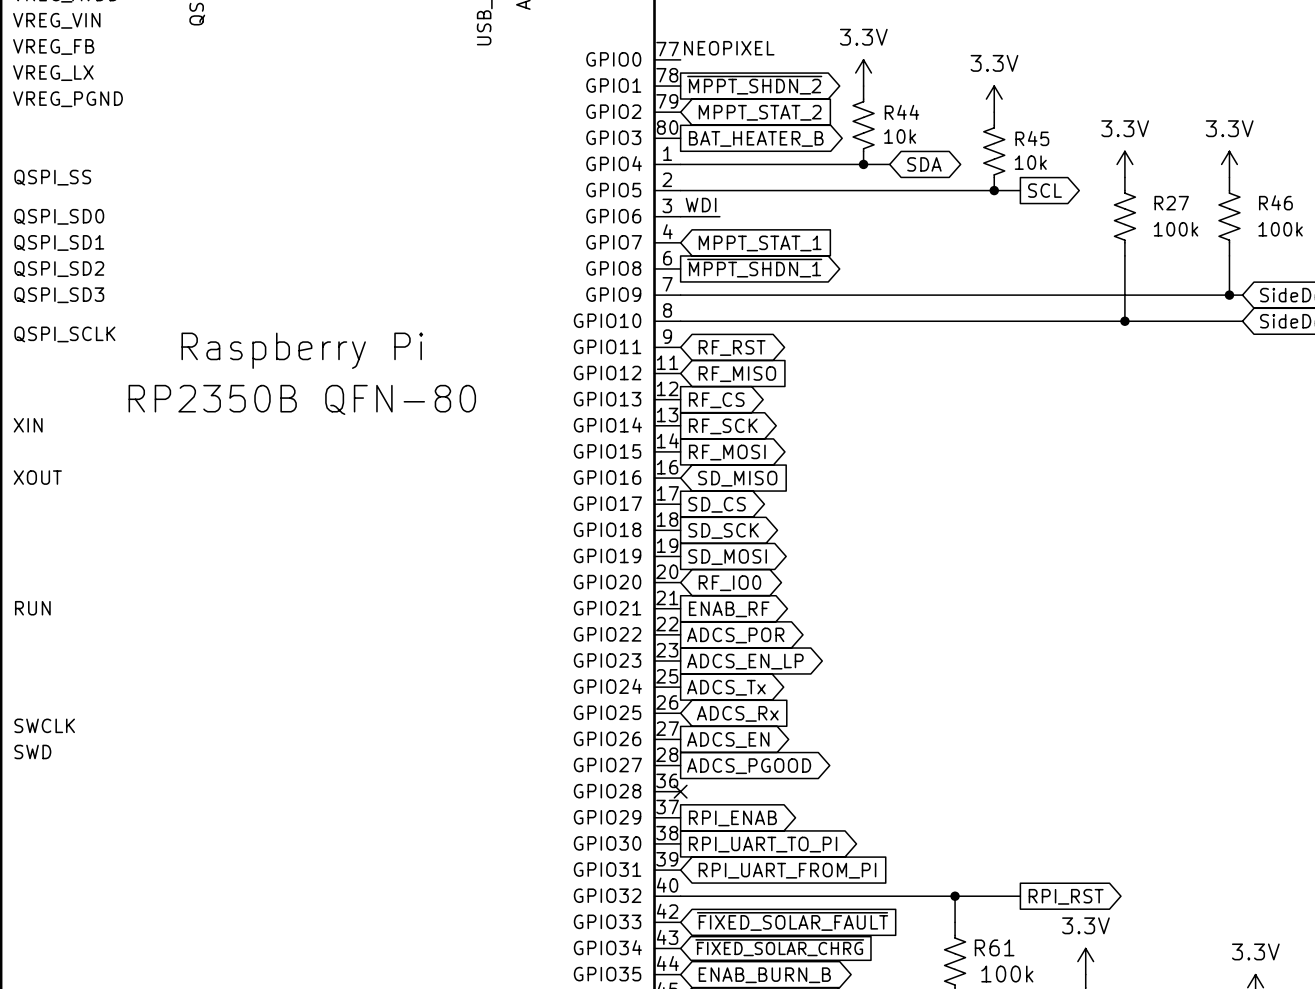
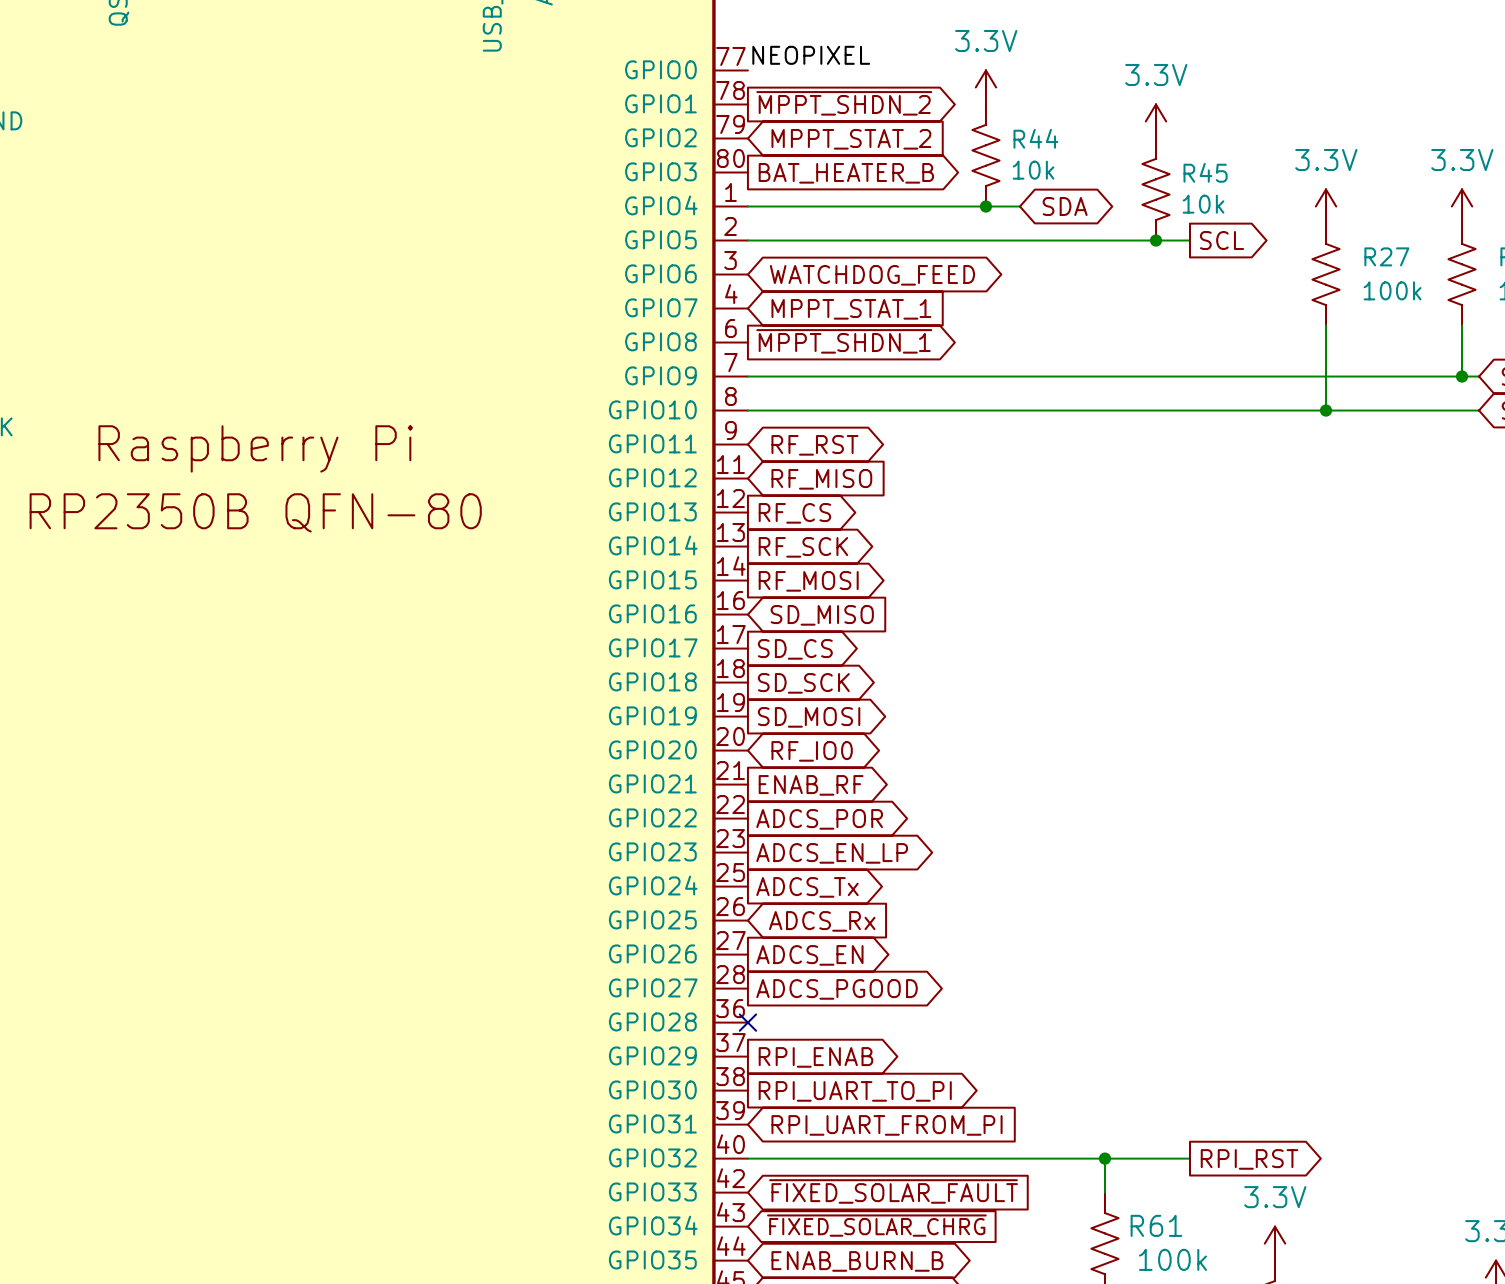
label: WDI (701, 205) -> none
wire: (680, 216) (719, 216) -> none
global label: none -> WATCHDOG_FEED (872, 275)

